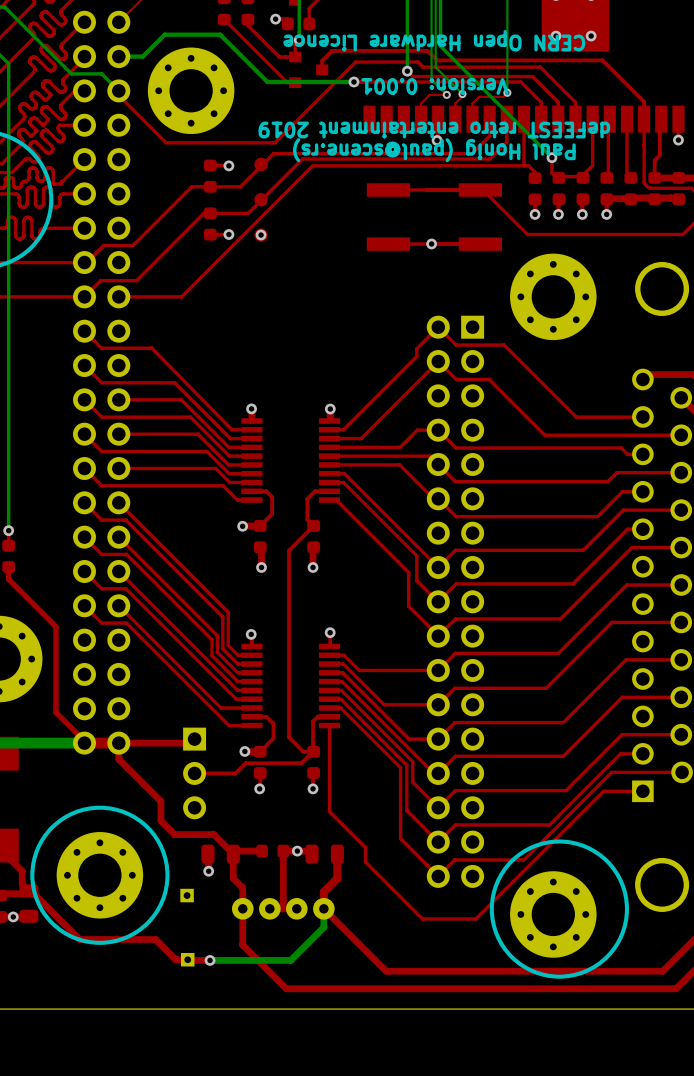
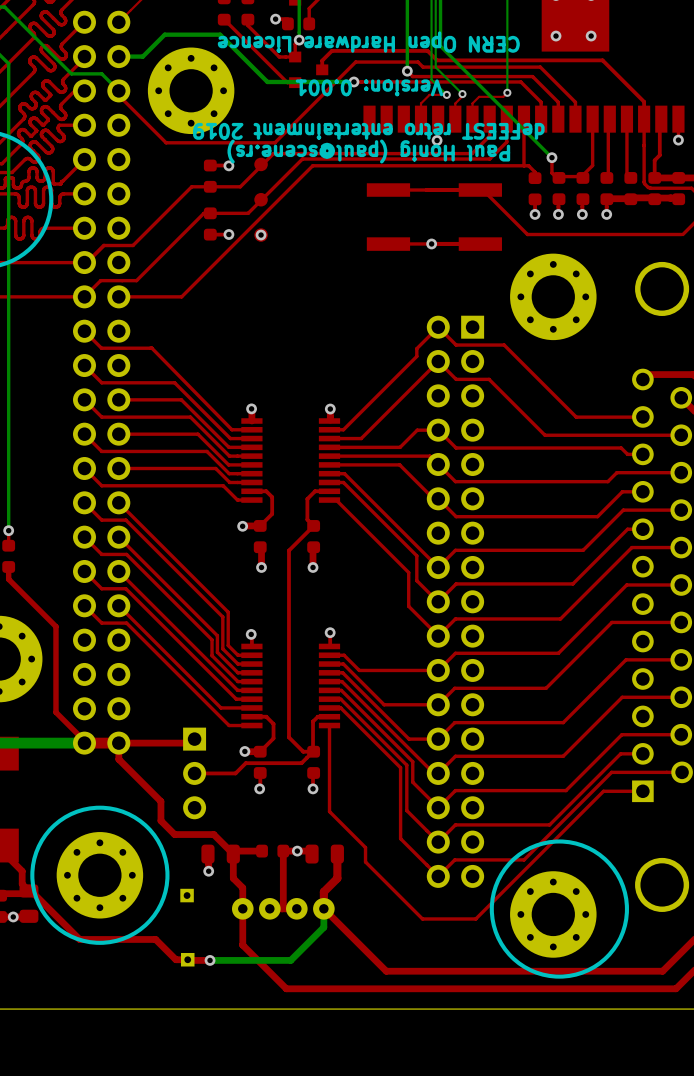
text position: CERN Open Hardware Licence (434, 40) -> CERN Open Hardware Licence (368, 42)
text position: Version: 0.001 (435, 86) -> Version: 0.001 (369, 87)
text position: deFEEST retro entertainment 2019 (434, 129) -> deFEEST retro entertainment 2019 (368, 131)
text position: Paul Honig (paul@scene.rs) (434, 150) -> Paul Honig (paul@scene.rs) (368, 151)

